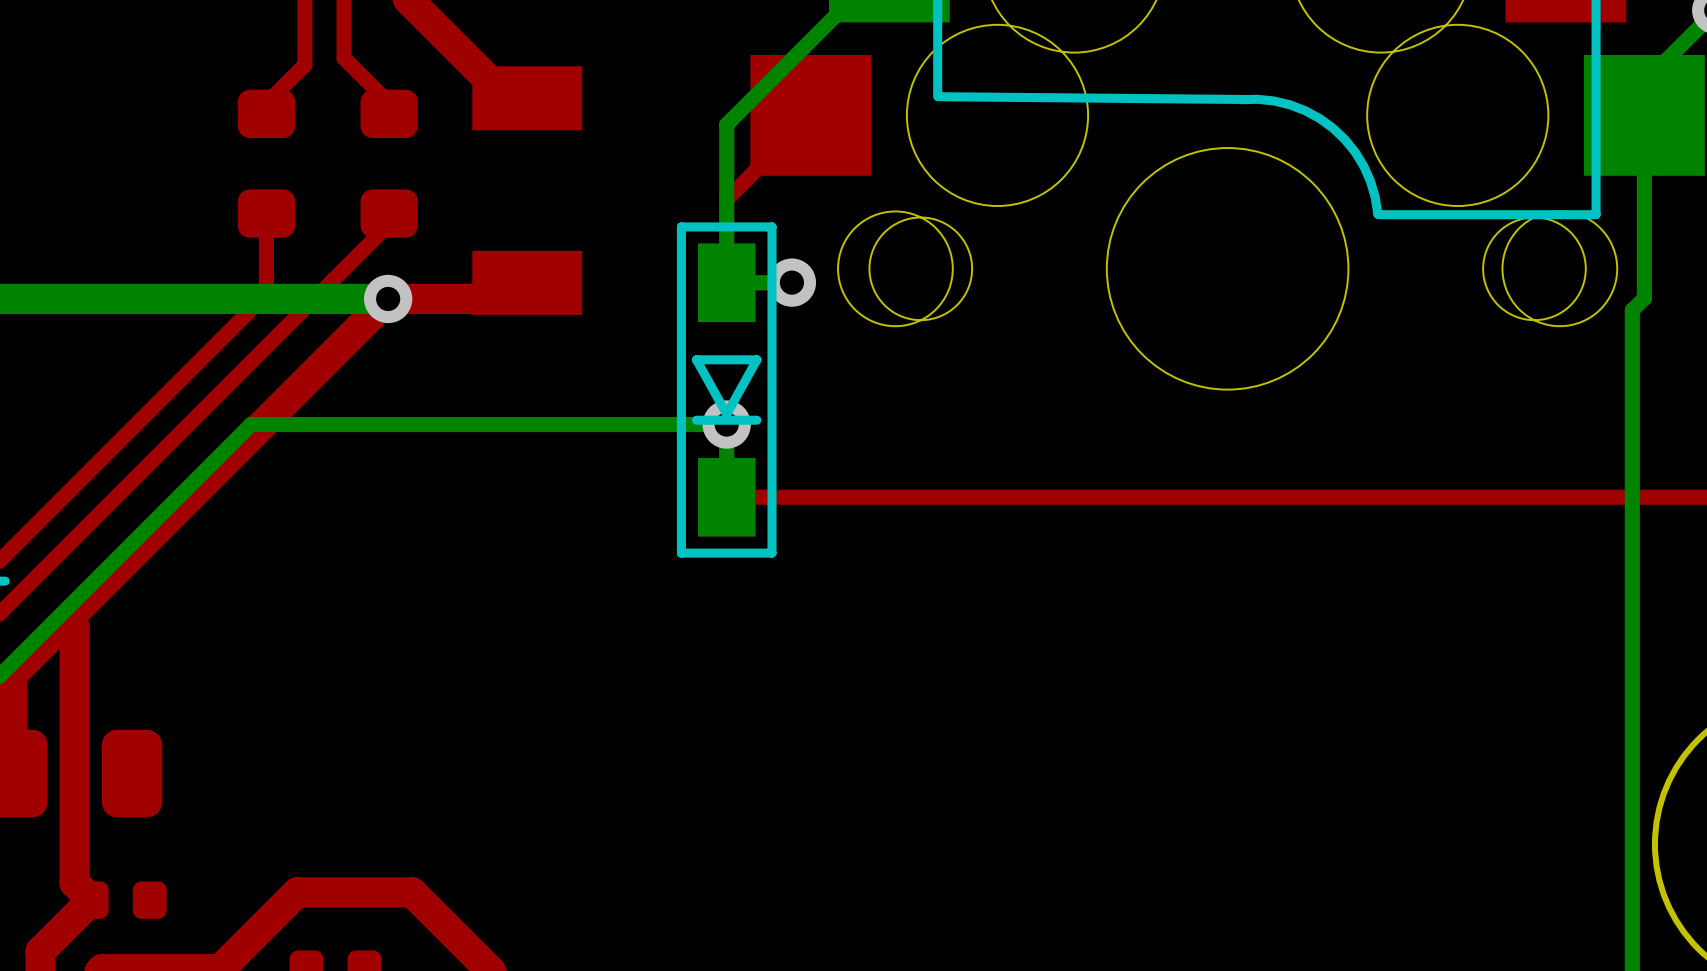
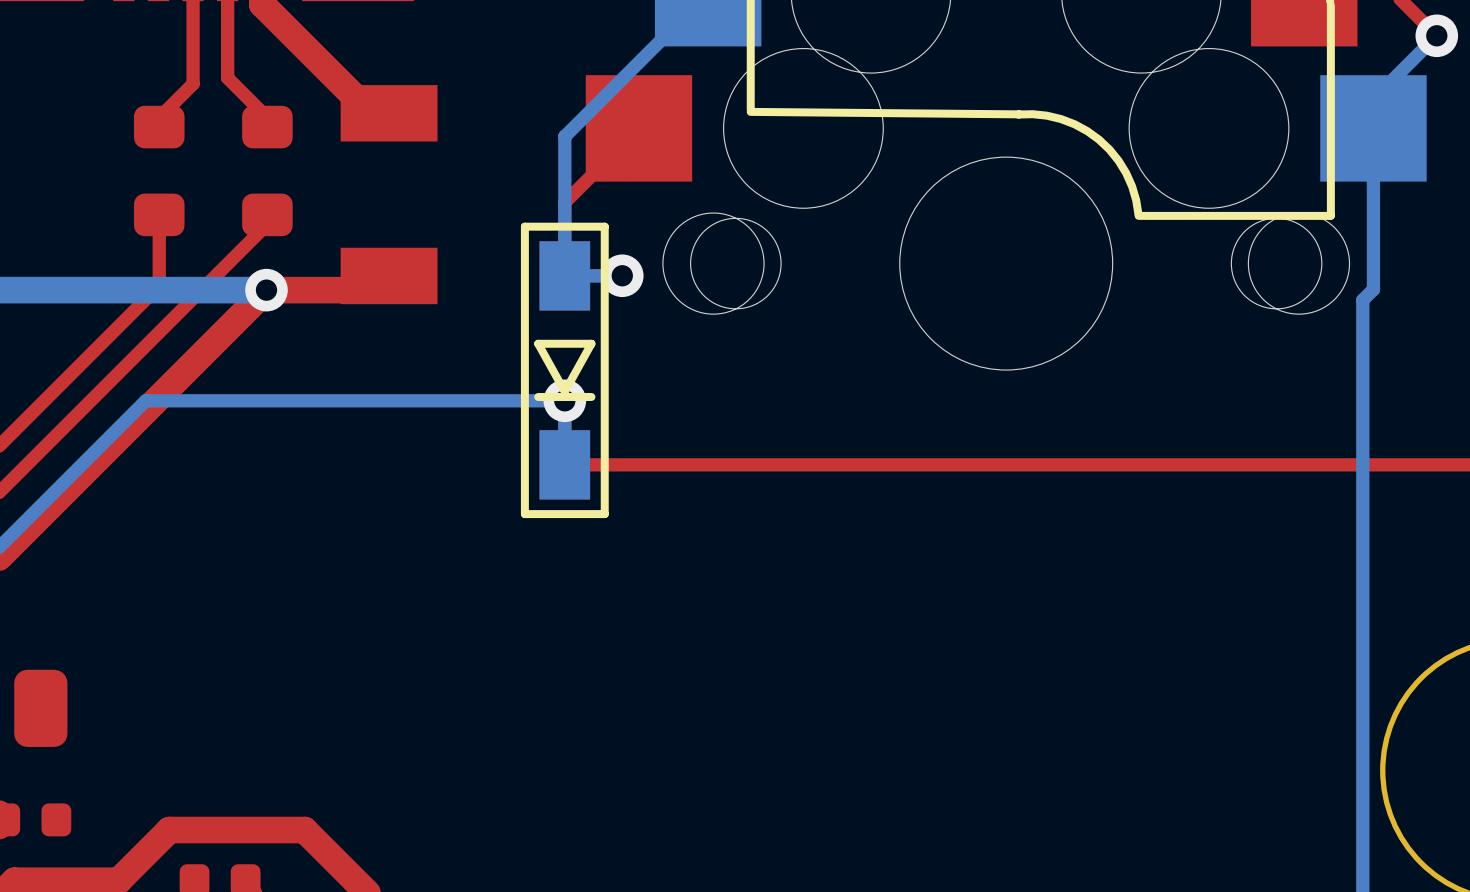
top track: (431, 911) (412, 892) (297, 892) (277, 911) -> (304, 830) (169, 830)

